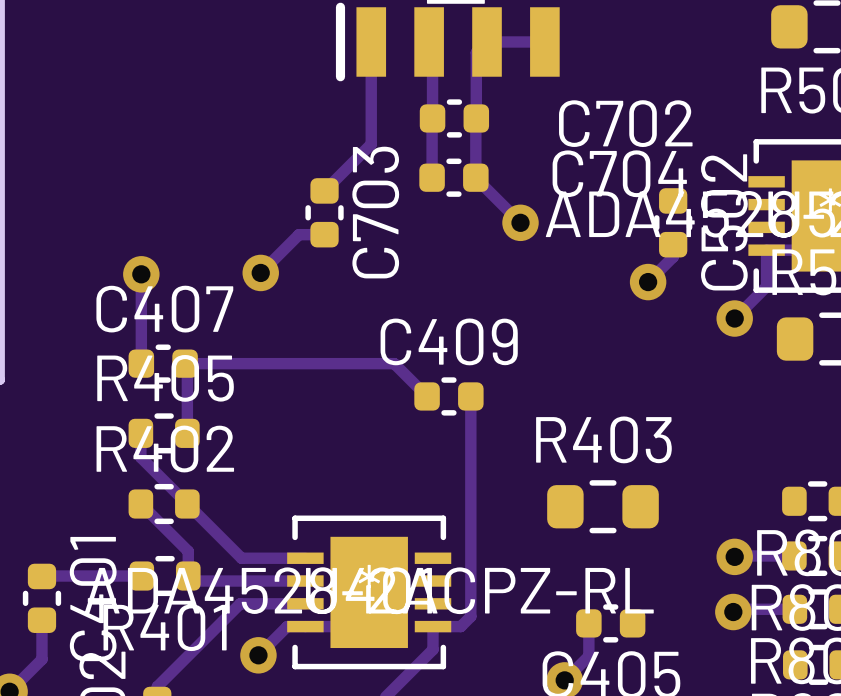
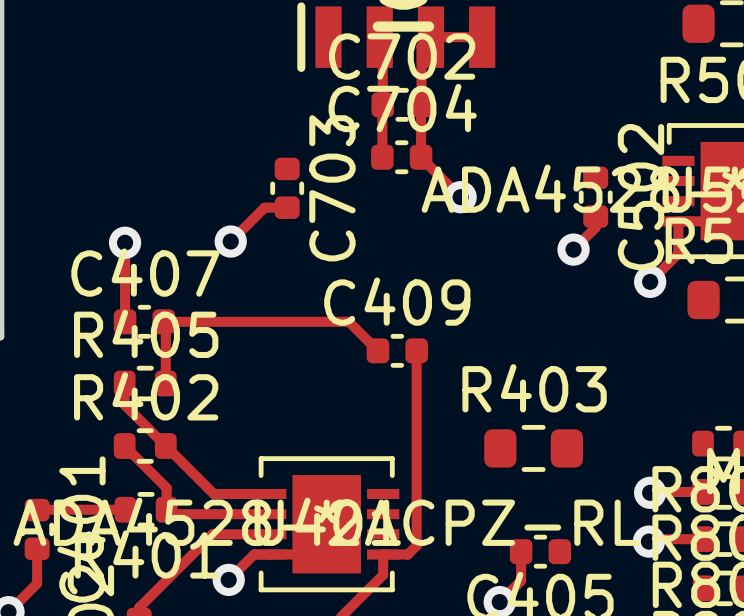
track: (371, 41) (371, 144) (324, 190) -> none
C702 name position: C702 (625, 123) -> C702 (402, 56)
C704 name position: C704 (619, 173) -> C704 (402, 108)

